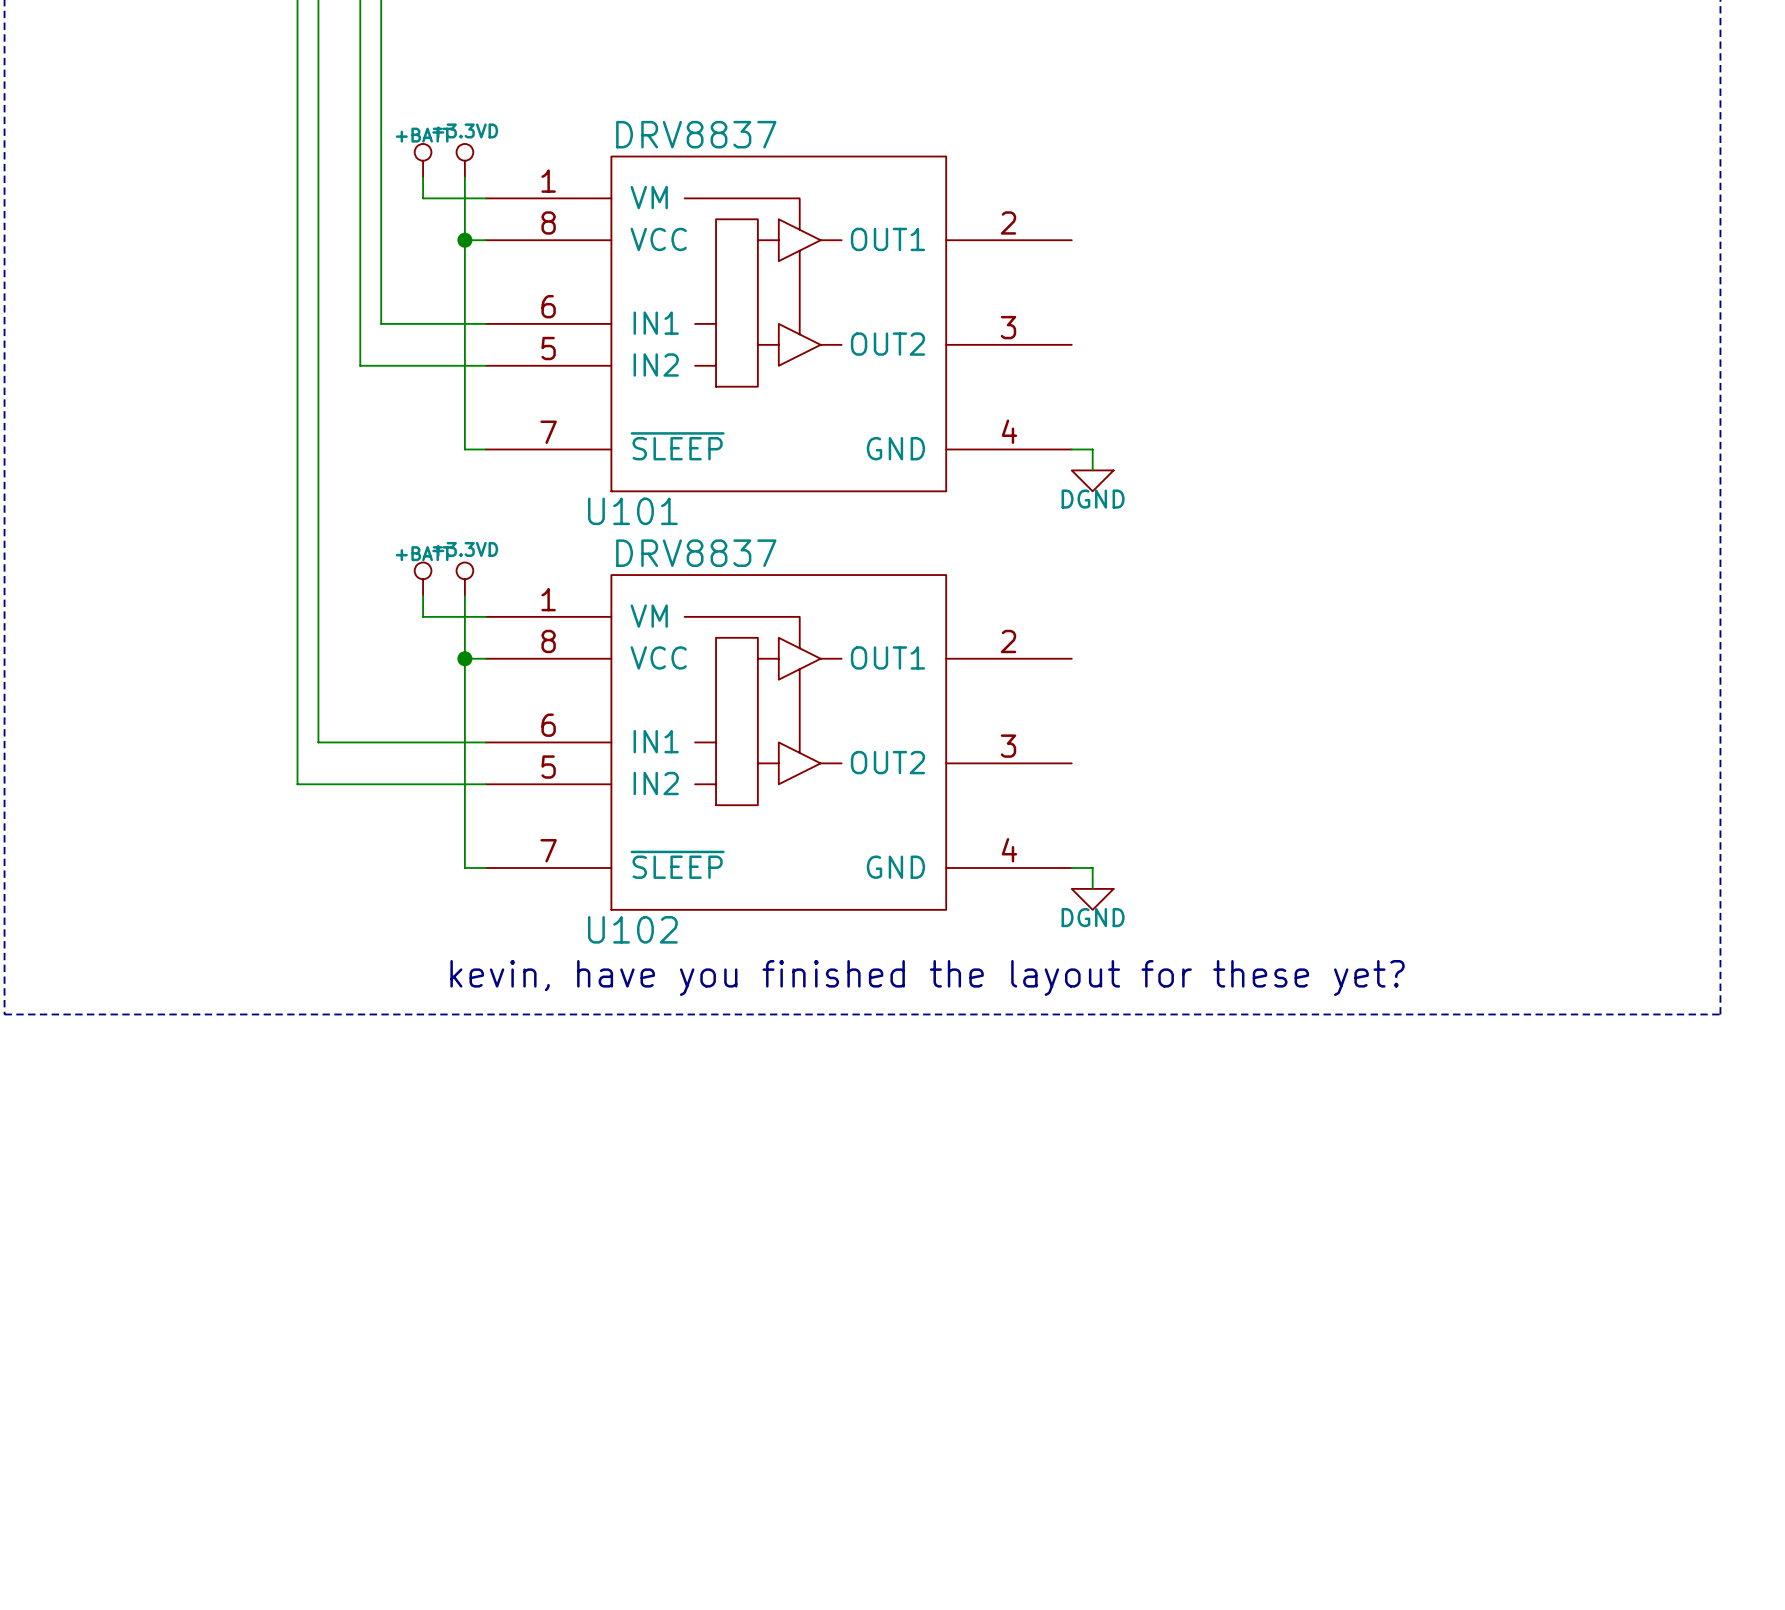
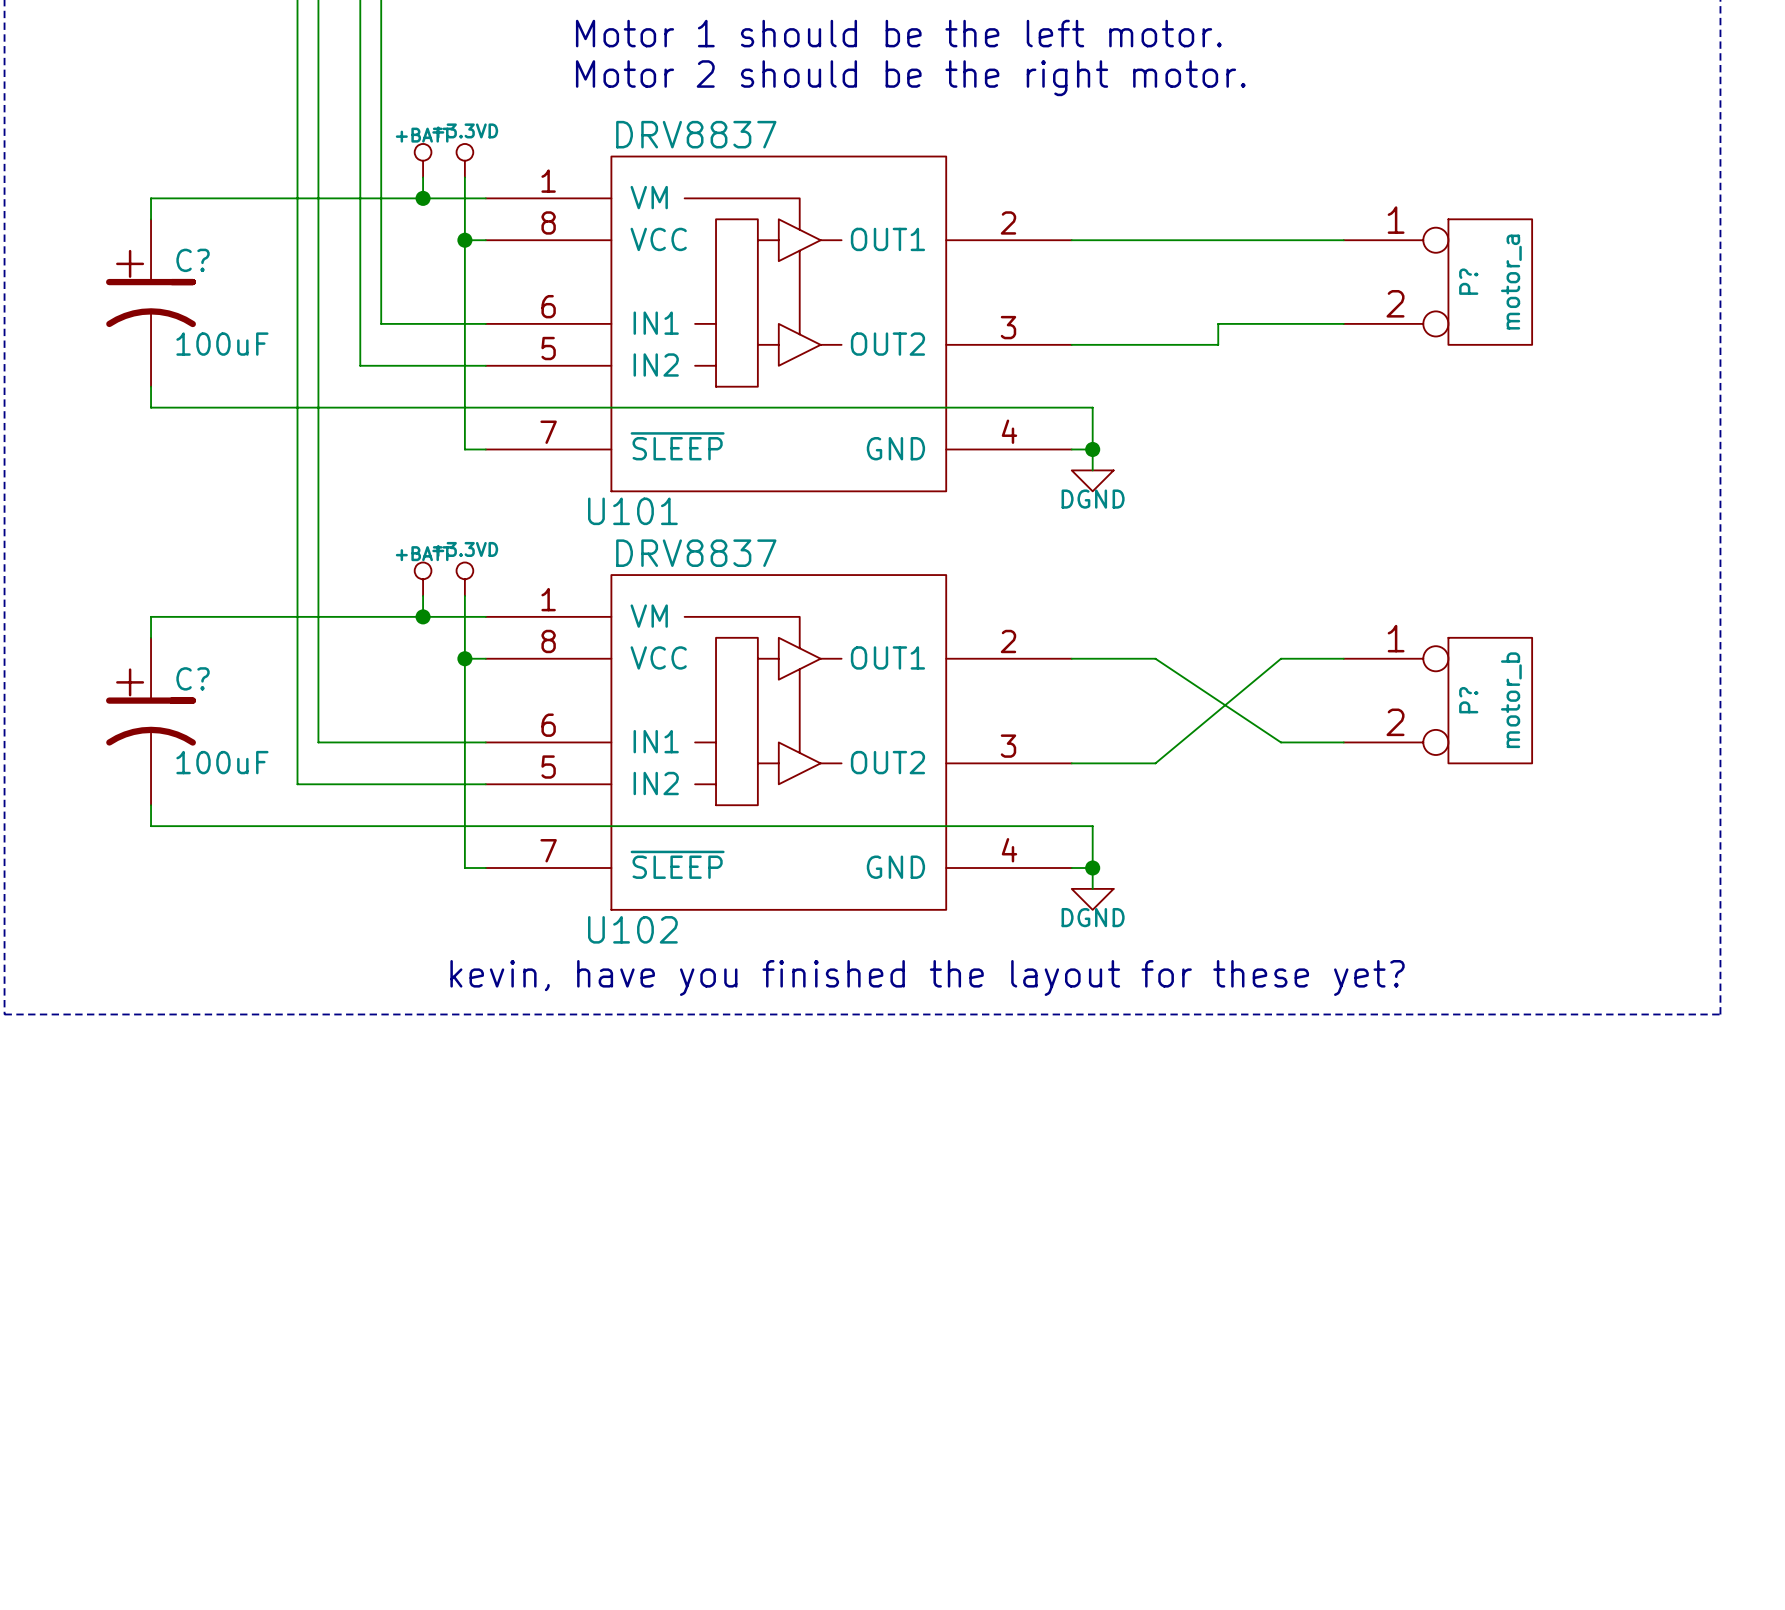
text: none -> Motor 1 should be the left motor. (898, 33)
text: none -> Motor 2 should be the right motor. (910, 78)
wire: none -> (423, 198) (151, 198) (151, 219)
junction: none -> (423, 198)
wire: none -> (1071, 240) (1343, 240)
P?: none -> motor_a (1437, 282)
C?: none -> 100uF (151, 303)
wire: none -> (1343, 323) (1218, 323) (1218, 344) (1071, 344)
wire: none -> (151, 386) (151, 407) (1092, 407) (1092, 449)
junction: none -> (1092, 449)
wire: none -> (423, 616) (151, 616) (151, 637)
junction: none -> (423, 616)
wire: none -> (1071, 658) (1155, 658) (1281, 742) (1343, 742)
wire: none -> (1343, 658) (1281, 658) (1155, 763) (1071, 763)
P?: none -> motor_b (1437, 700)
C?: none -> 100uF (151, 721)
wire: none -> (151, 805) (151, 826) (1092, 826) (1092, 868)
junction: none -> (1092, 868)

